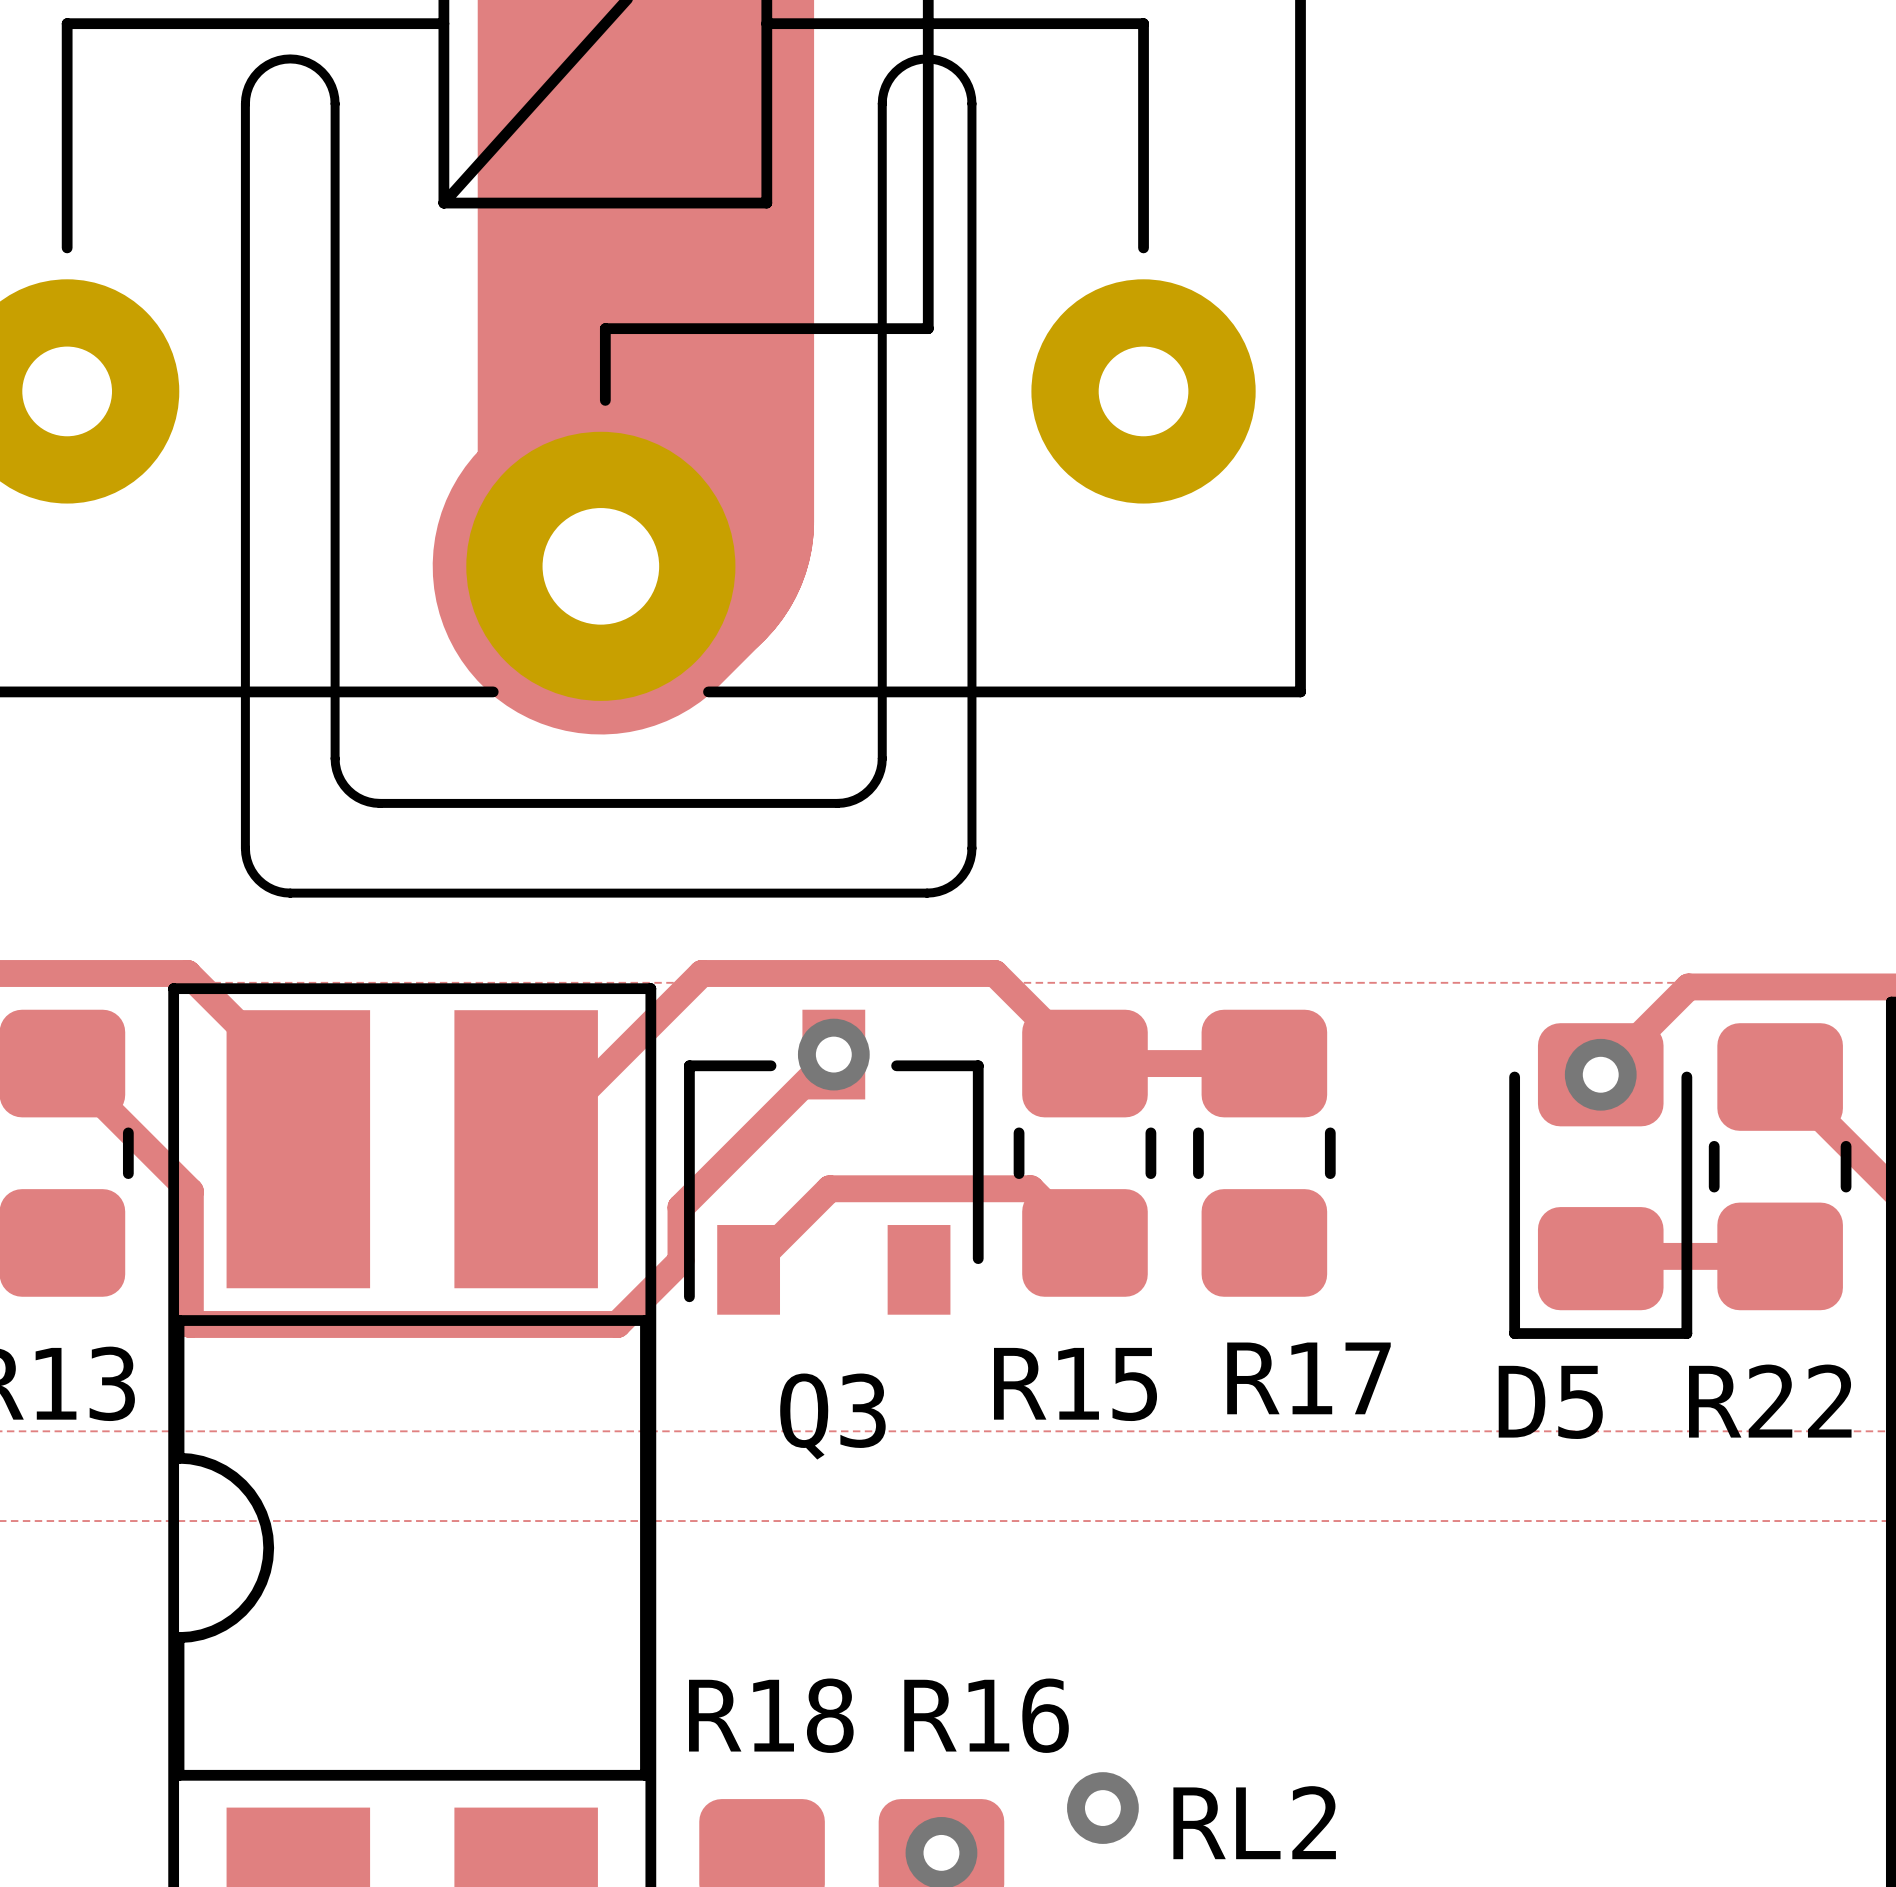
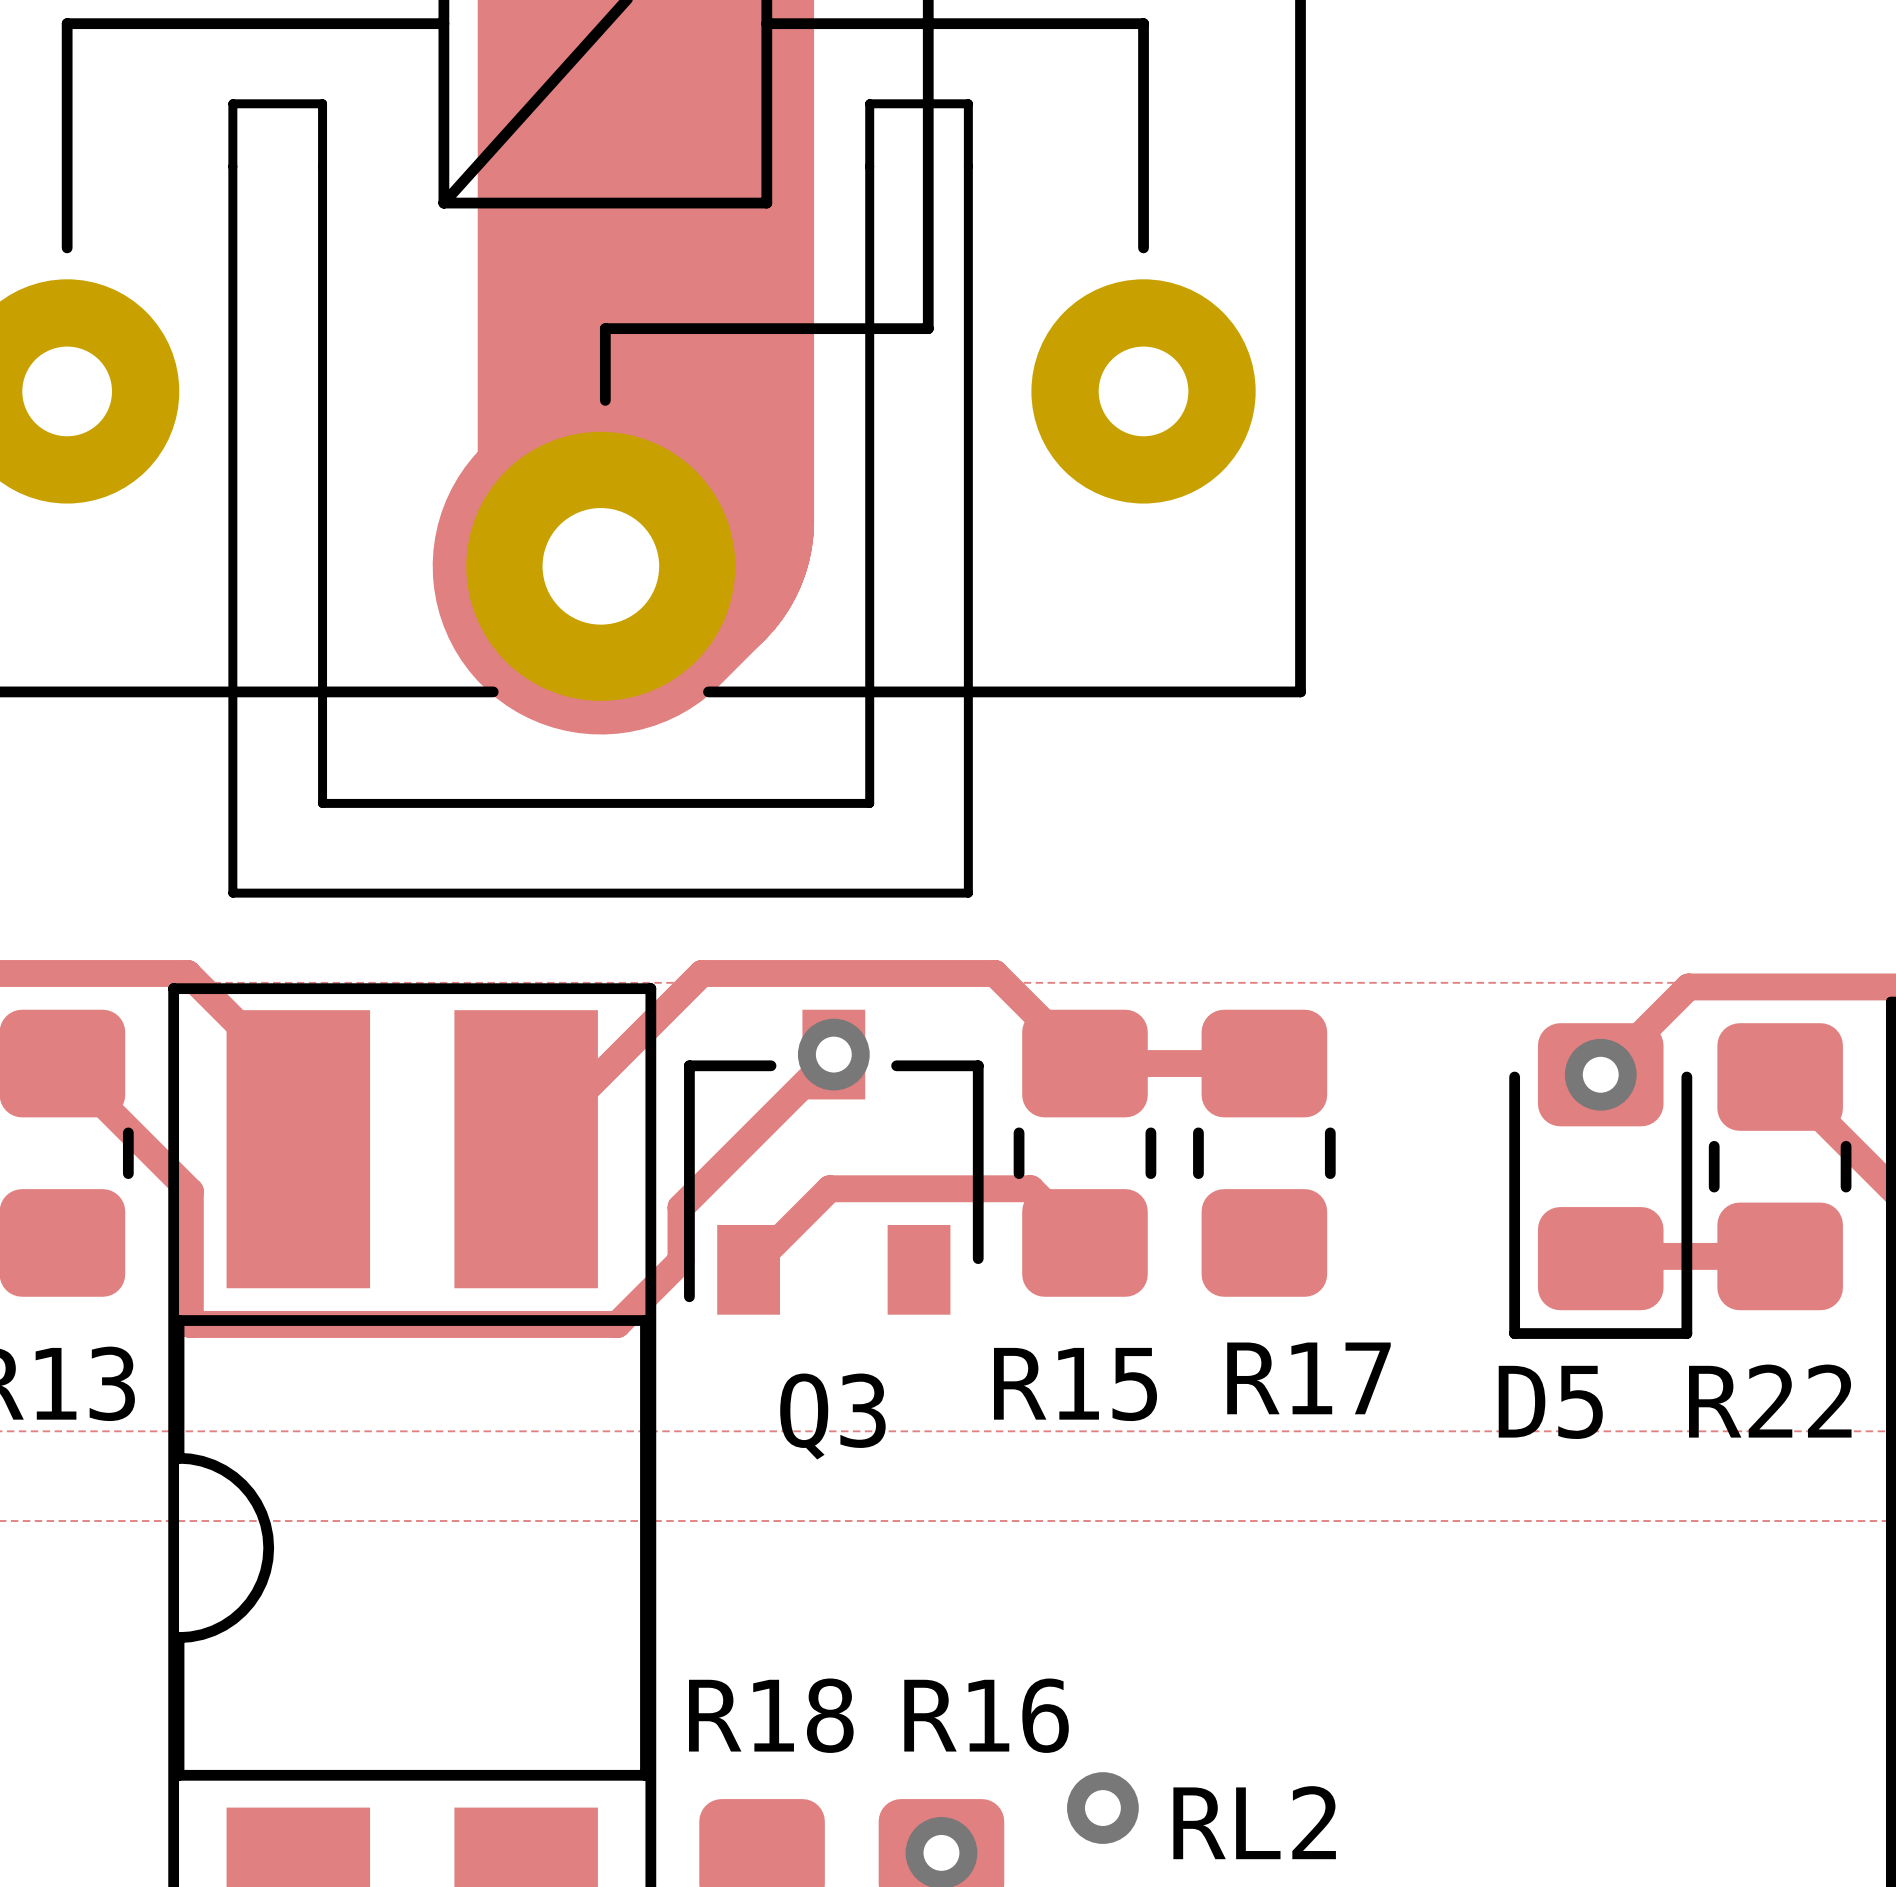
board edge: (379, 803) (362, 800) (348, 790) (338, 775) (335, 758) (334, 97) (329, 81) (317, 68) (301, 60) (284, 59) (267, 64) (258, 72) (248, 86) (245, 103) (245, 848) (248, 865) (258, 879) (273, 889) (290, 893) -> (379, 803) (322, 803) (322, 103) (232, 103) (232, 893) (290, 893)
board edge: (837, 803) (854, 800) (869, 790) (878, 775) (882, 758) (882, 97) (888, 81) (899, 68) (915, 60) (932, 59) (949, 64) (958, 72) (968, 86) (971, 103) (971, 848) (968, 865) (958, 879) (944, 889) (927, 893) -> (837, 803) (869, 803) (869, 103) (968, 103) (968, 893) (927, 893)

